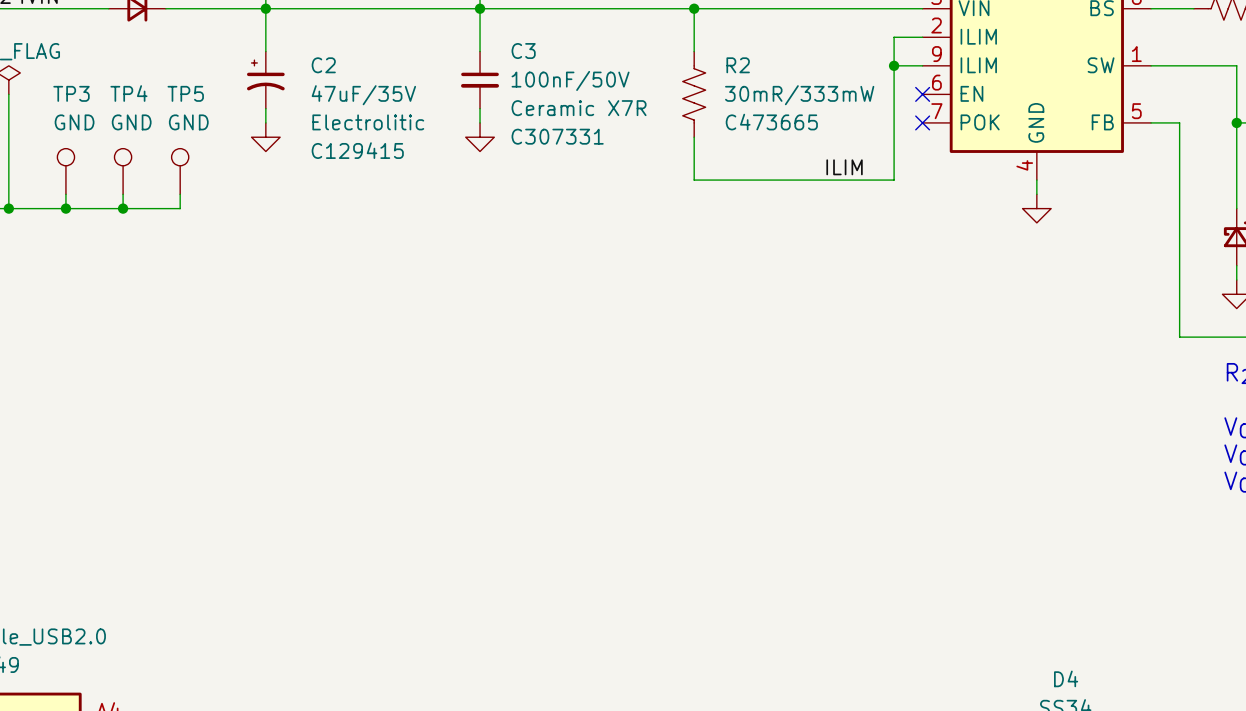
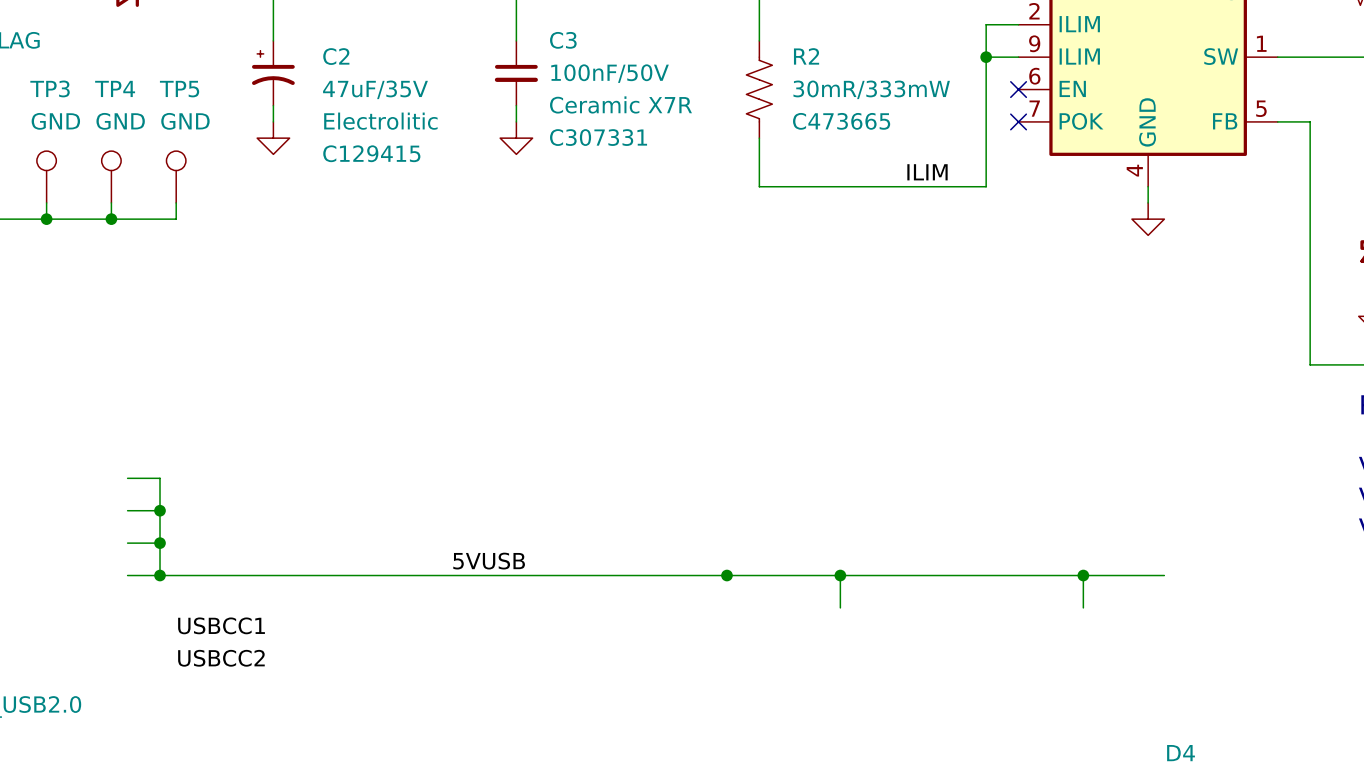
wire: none -> (127, 478) (160, 478) (160, 575)
wire: none -> (127, 510) (160, 510)
junction: none -> (160, 510)
wire: none -> (127, 543) (160, 543)
junction: none -> (160, 543)
label: none -> 5VUSB (489, 561)
wire: none -> (127, 575) (1164, 575)
junction: none -> (160, 575)
junction: none -> (726, 575)
wire: none -> (840, 575) (840, 607)
junction: none -> (840, 575)
wire: none -> (1083, 575) (1083, 607)
junction: none -> (1083, 575)
label: none -> USBCC1 (221, 625)
label: none -> USBCC2 (221, 658)

